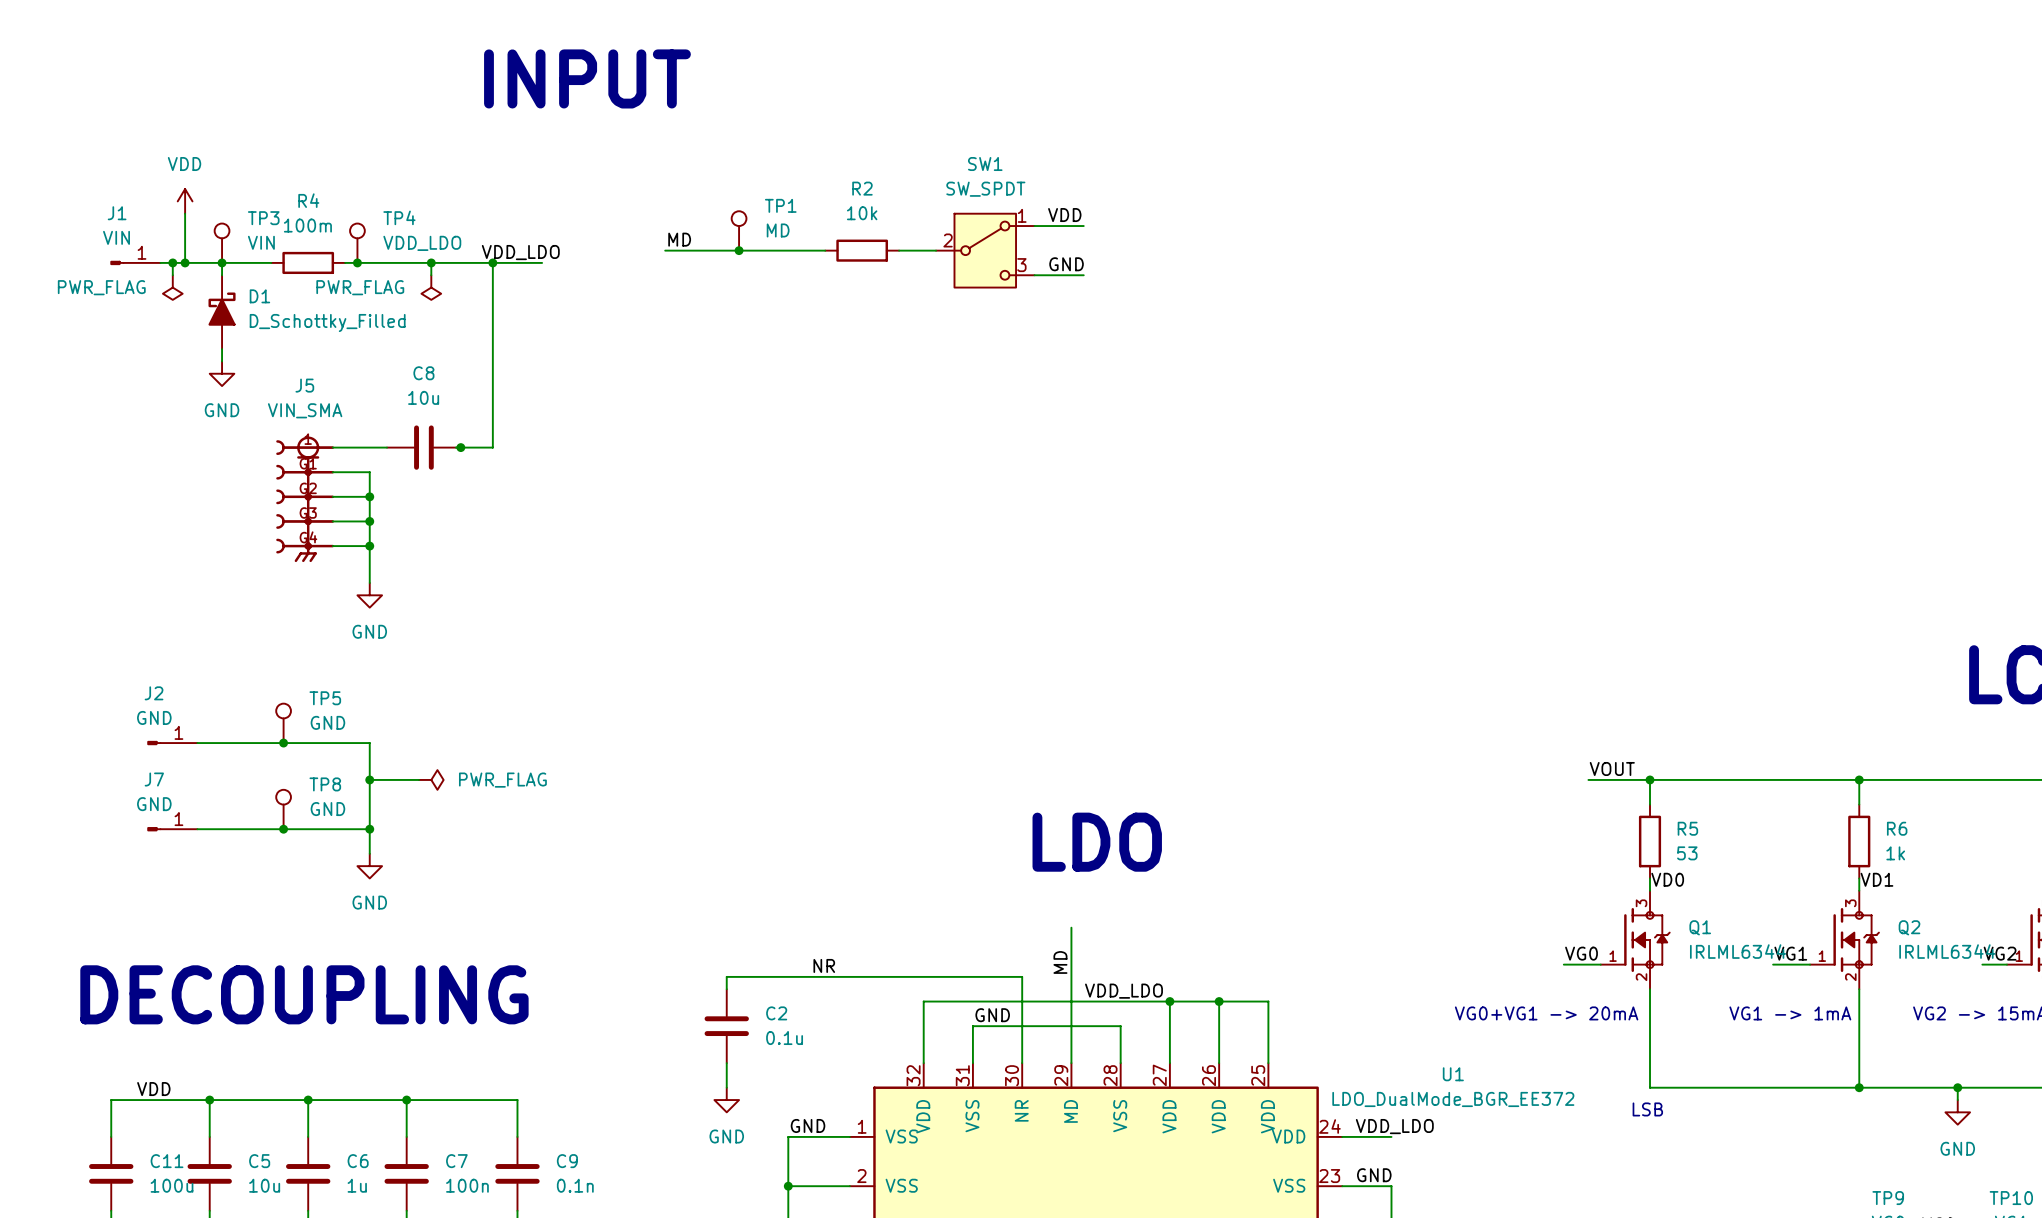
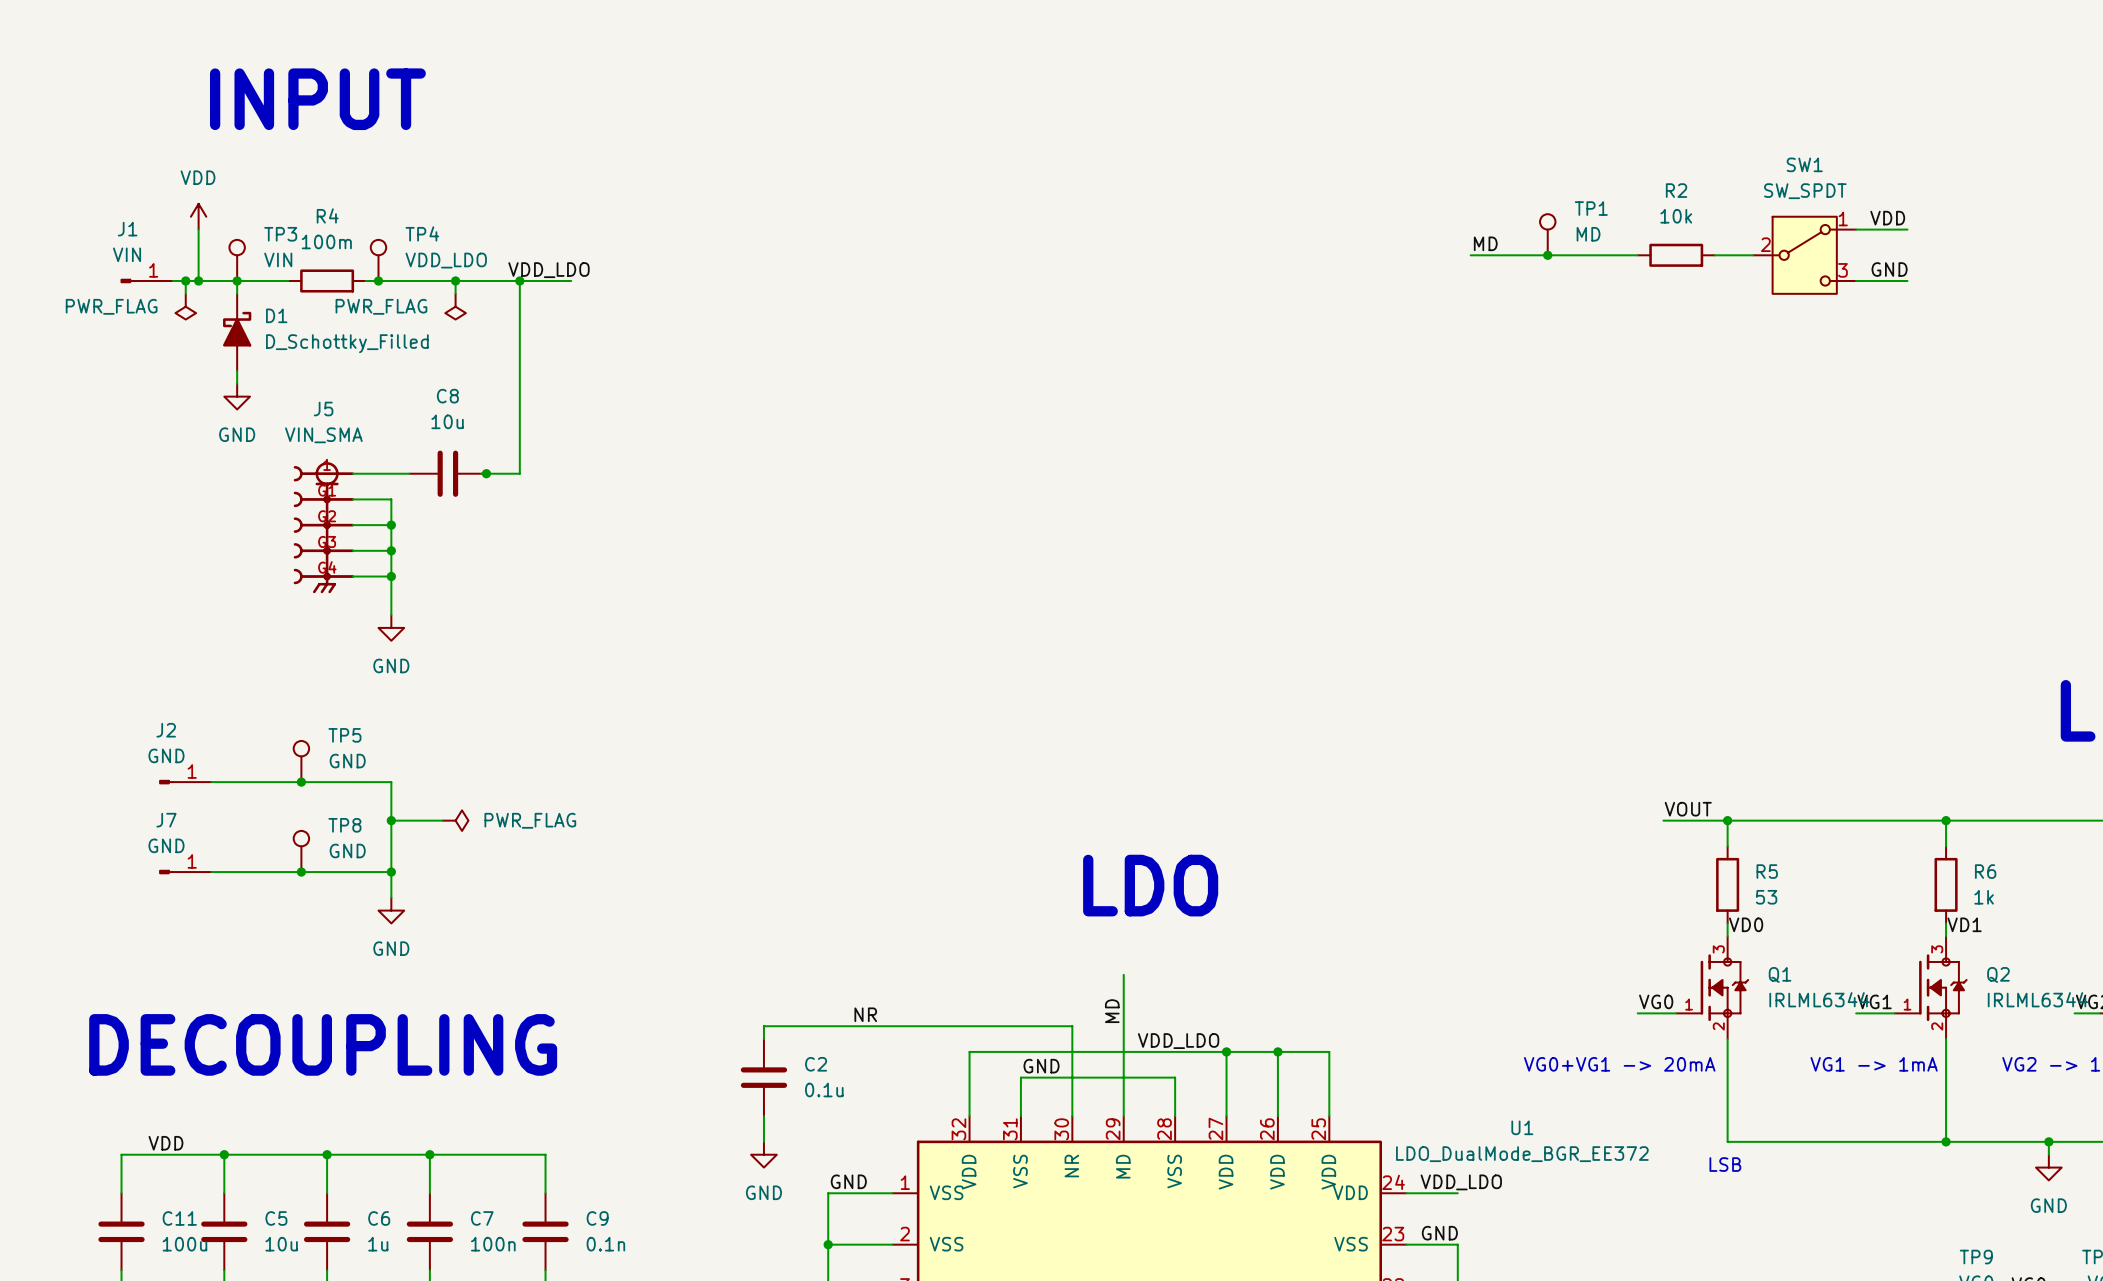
text: INPUT (587, 78) -> none
text: none -> INPUT (317, 99)
label: none -> VDD (1887, 218)
wire: none -> (1856, 229) (1907, 229)
label: VDD (1064, 215) -> none
wire: (1034, 226) (1083, 226) -> none
label: none -> MD (1485, 243)
TP1 position: (739, 230) -> (1547, 234)
wire: none -> (1470, 255) (1637, 255)
junction: none -> (1547, 255)
wire: none -> (1714, 255) (1753, 255)
label: MD (679, 239) -> none
wire: (665, 250) (825, 250) -> none
junction: (739, 250) -> none
R2 position: (862, 250) -> (1676, 255)
wire: (899, 250) (936, 250) -> none
SW1 position: (985, 250) -> (1804, 255)
label: none -> GND (1889, 269)
wire: none -> (1856, 280) (1907, 280)
label: GND (1066, 264) -> none
wire: (1034, 275) (1083, 275) -> none

